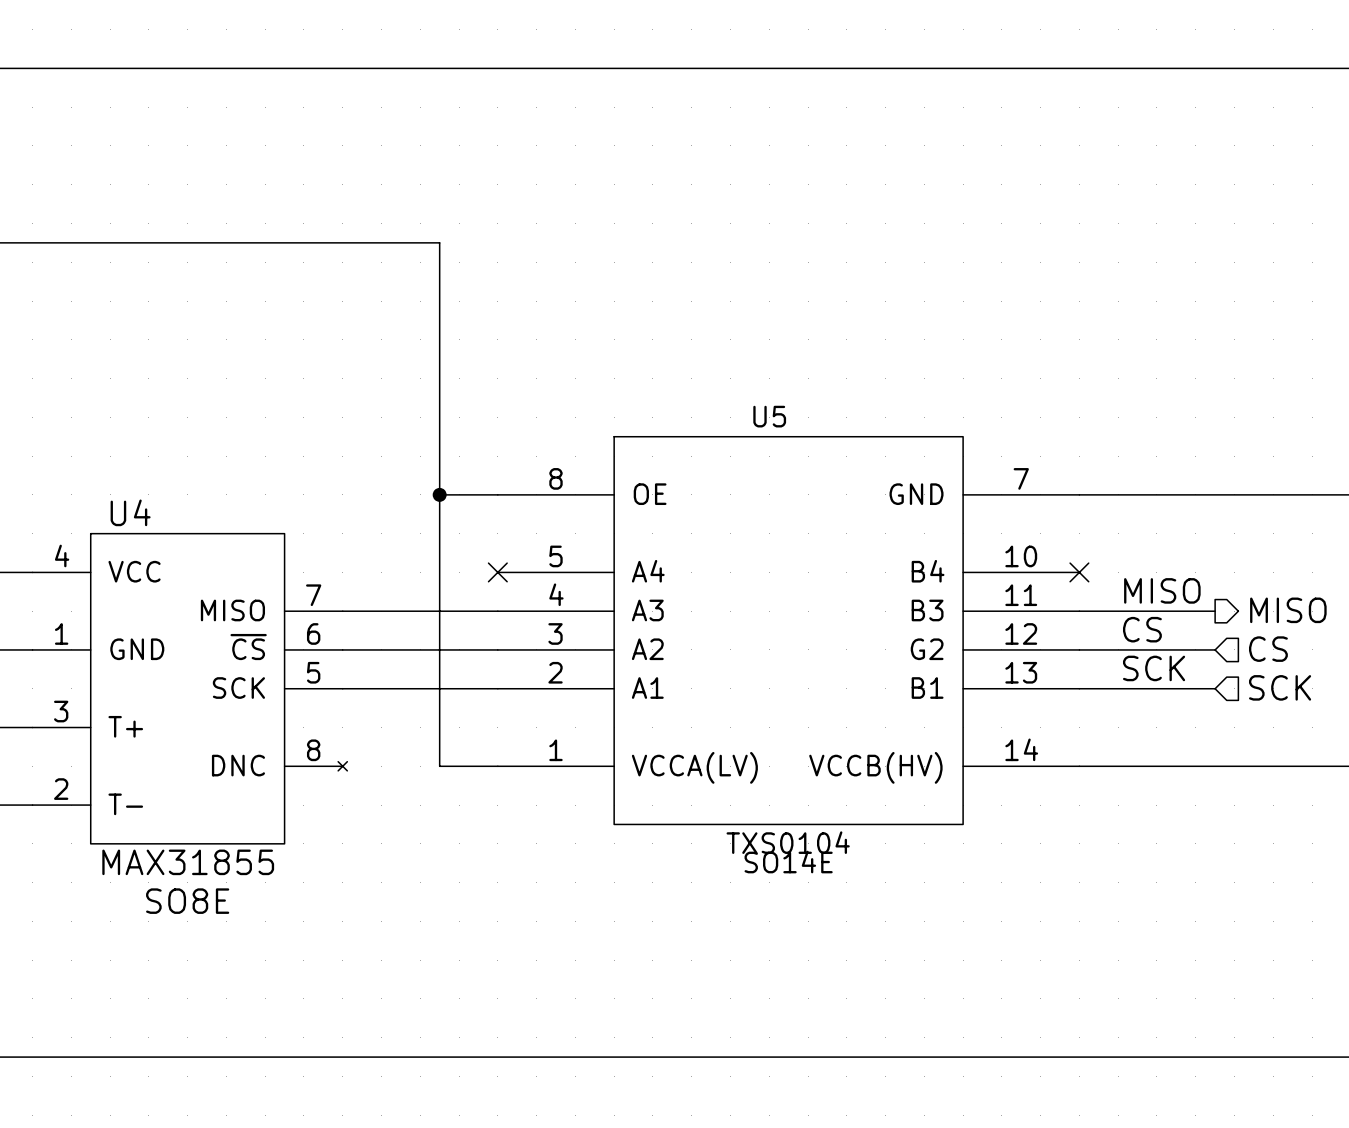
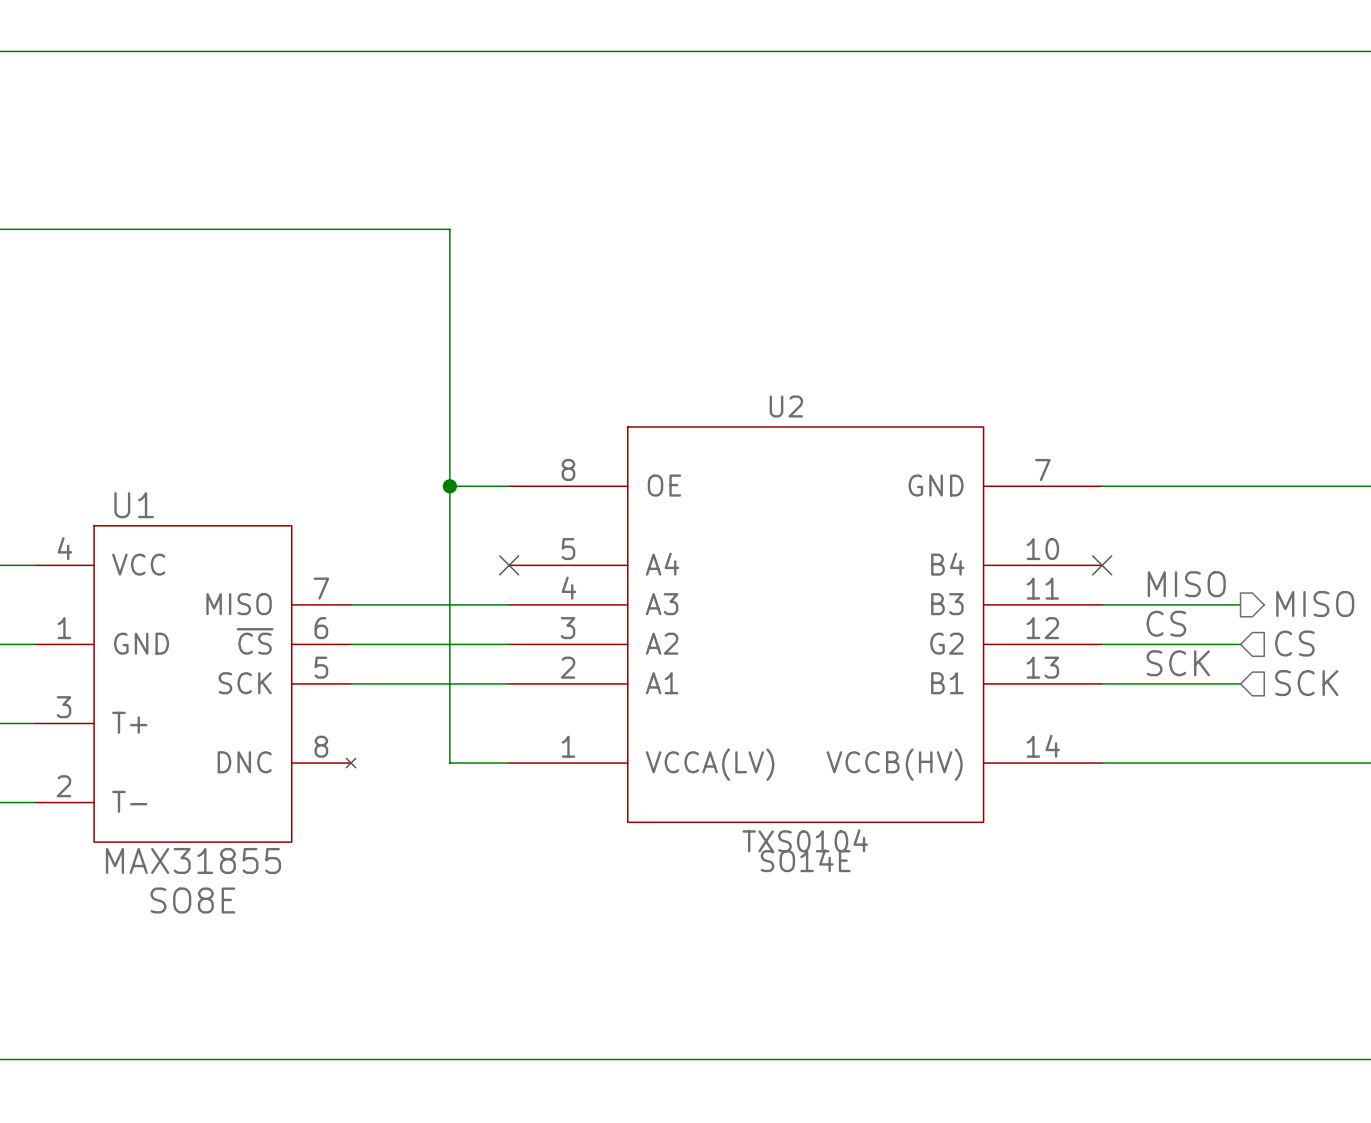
U5 name: U5 (769, 416) -> U2 (786, 406)
U4 name: U4 (130, 512) -> U1 (134, 505)

